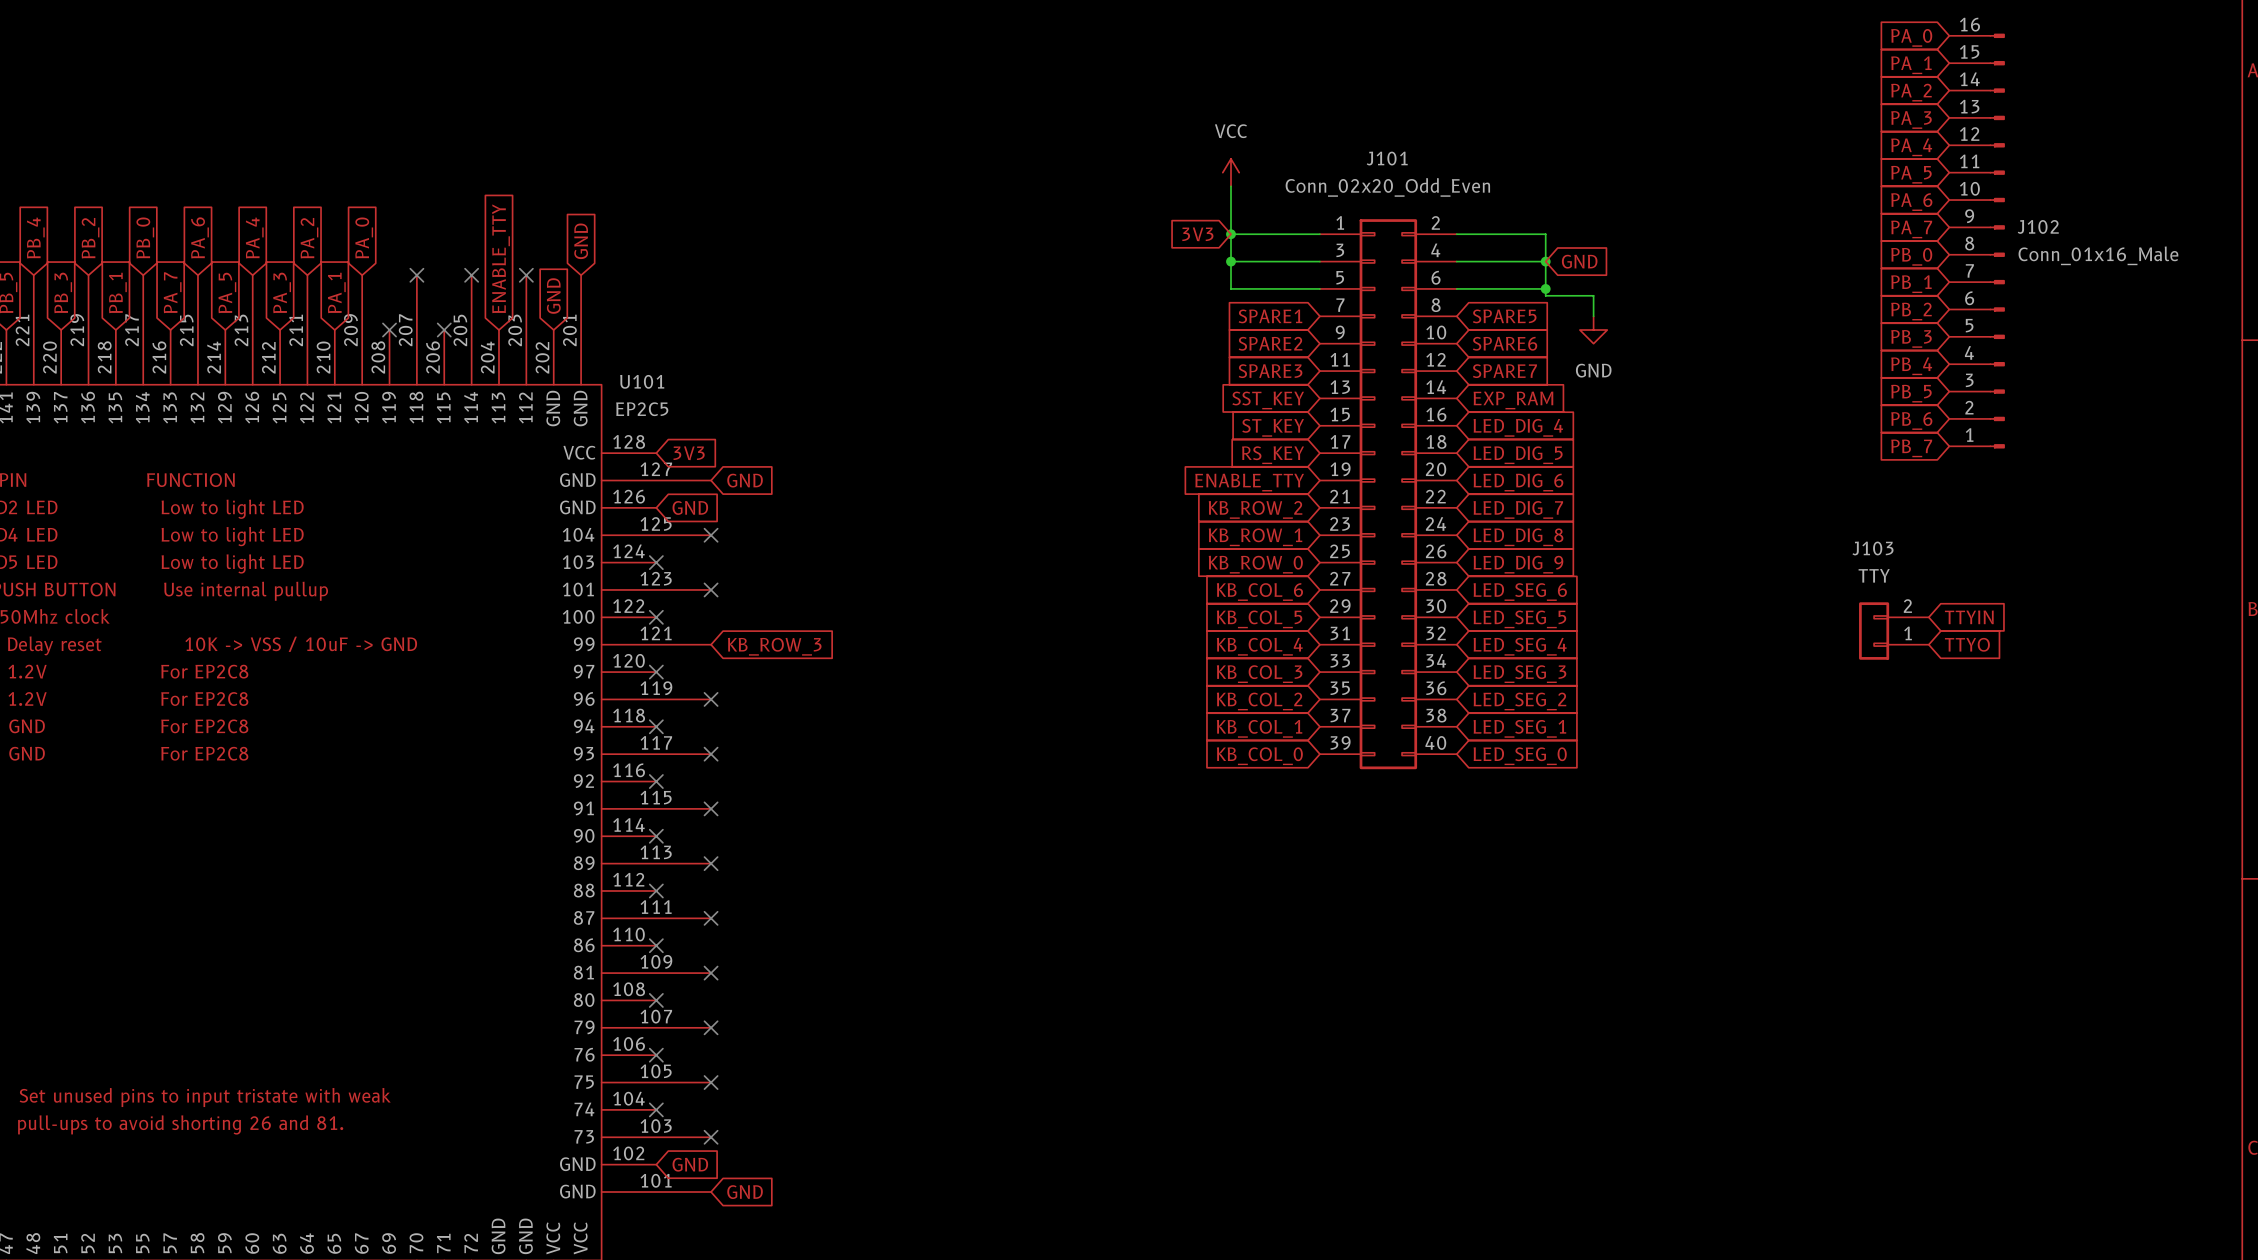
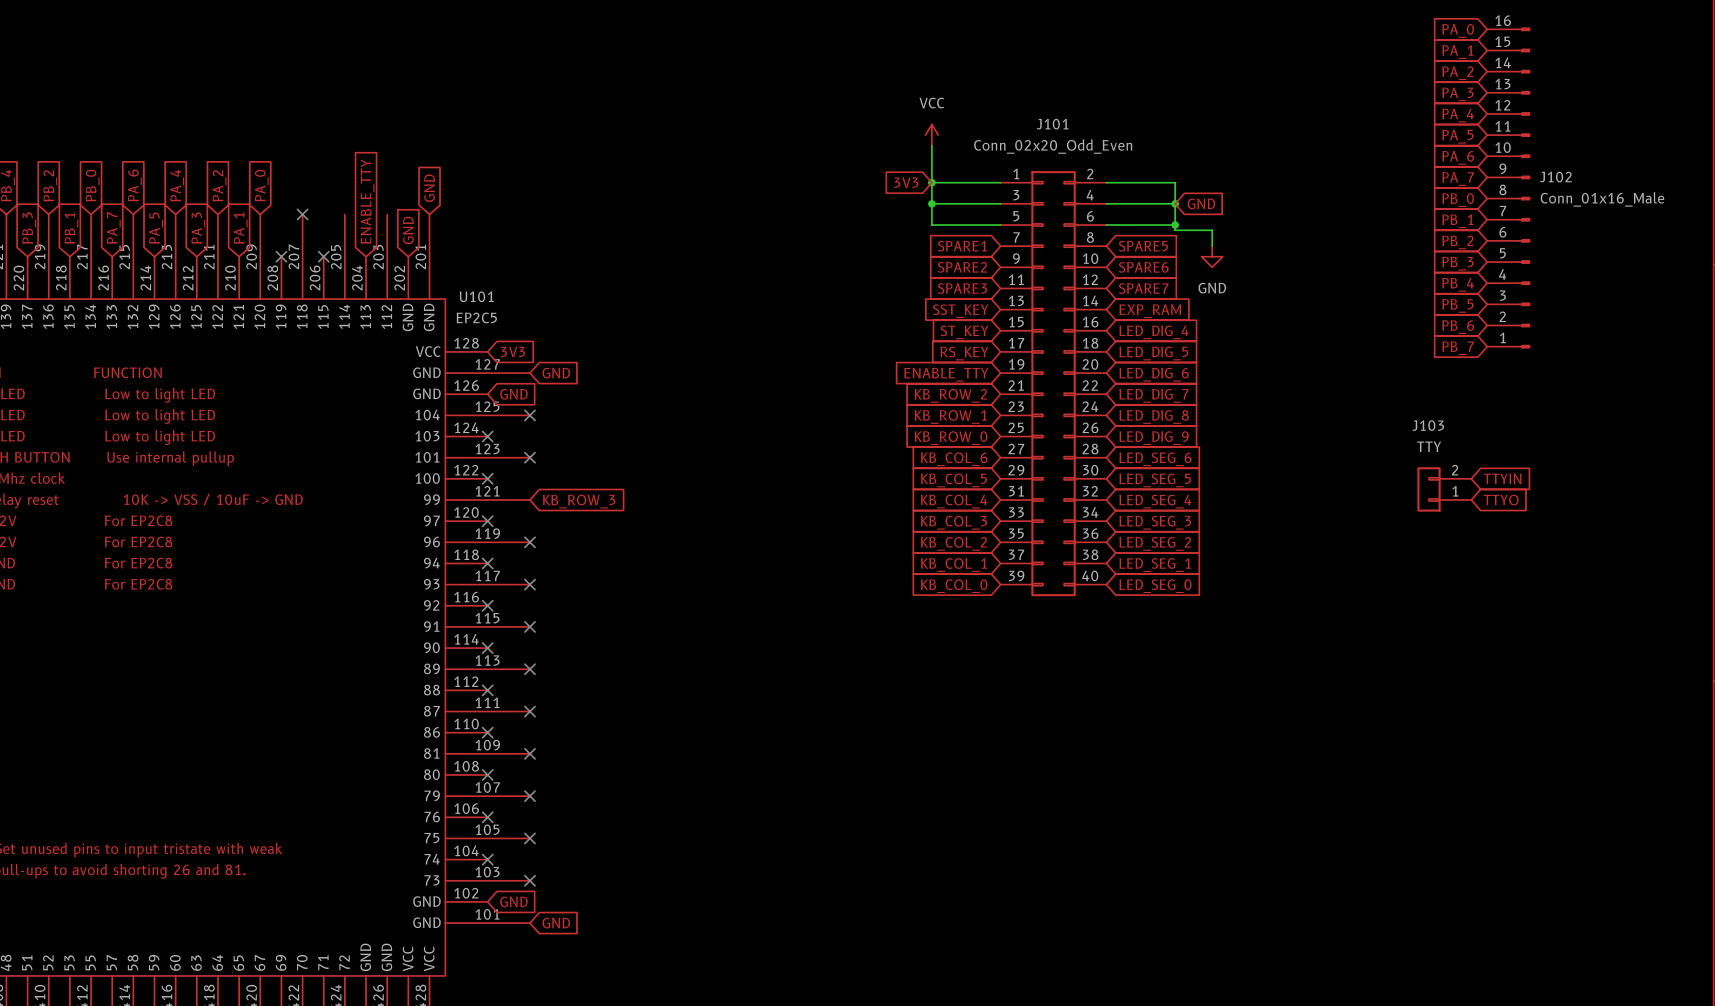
no-connect mark: (471, 275) -> none
no-connect mark: (526, 275) -> none

